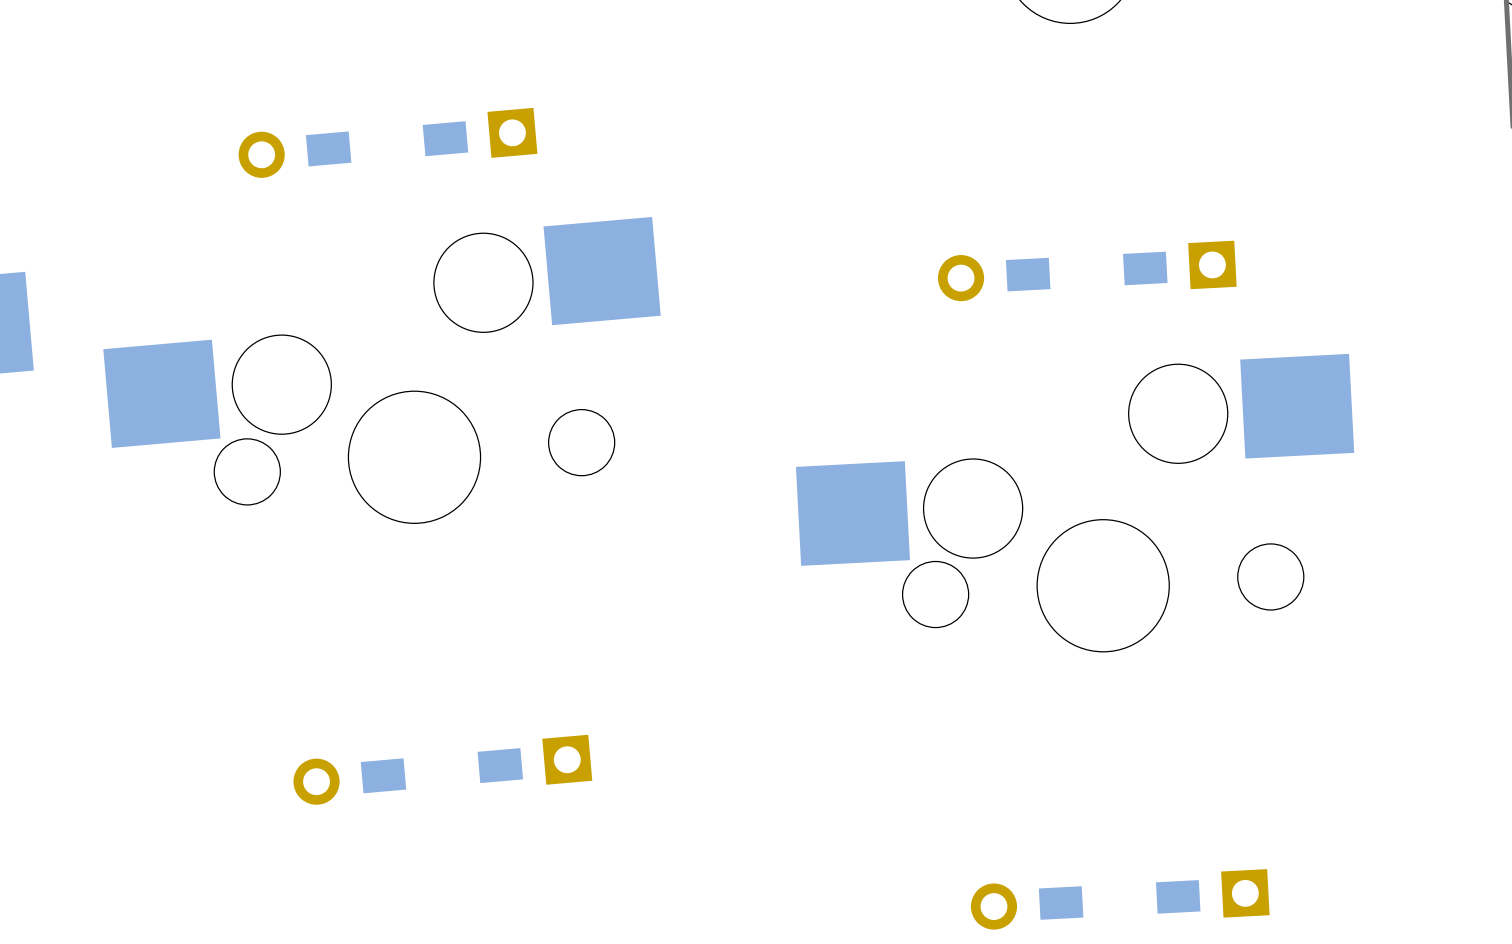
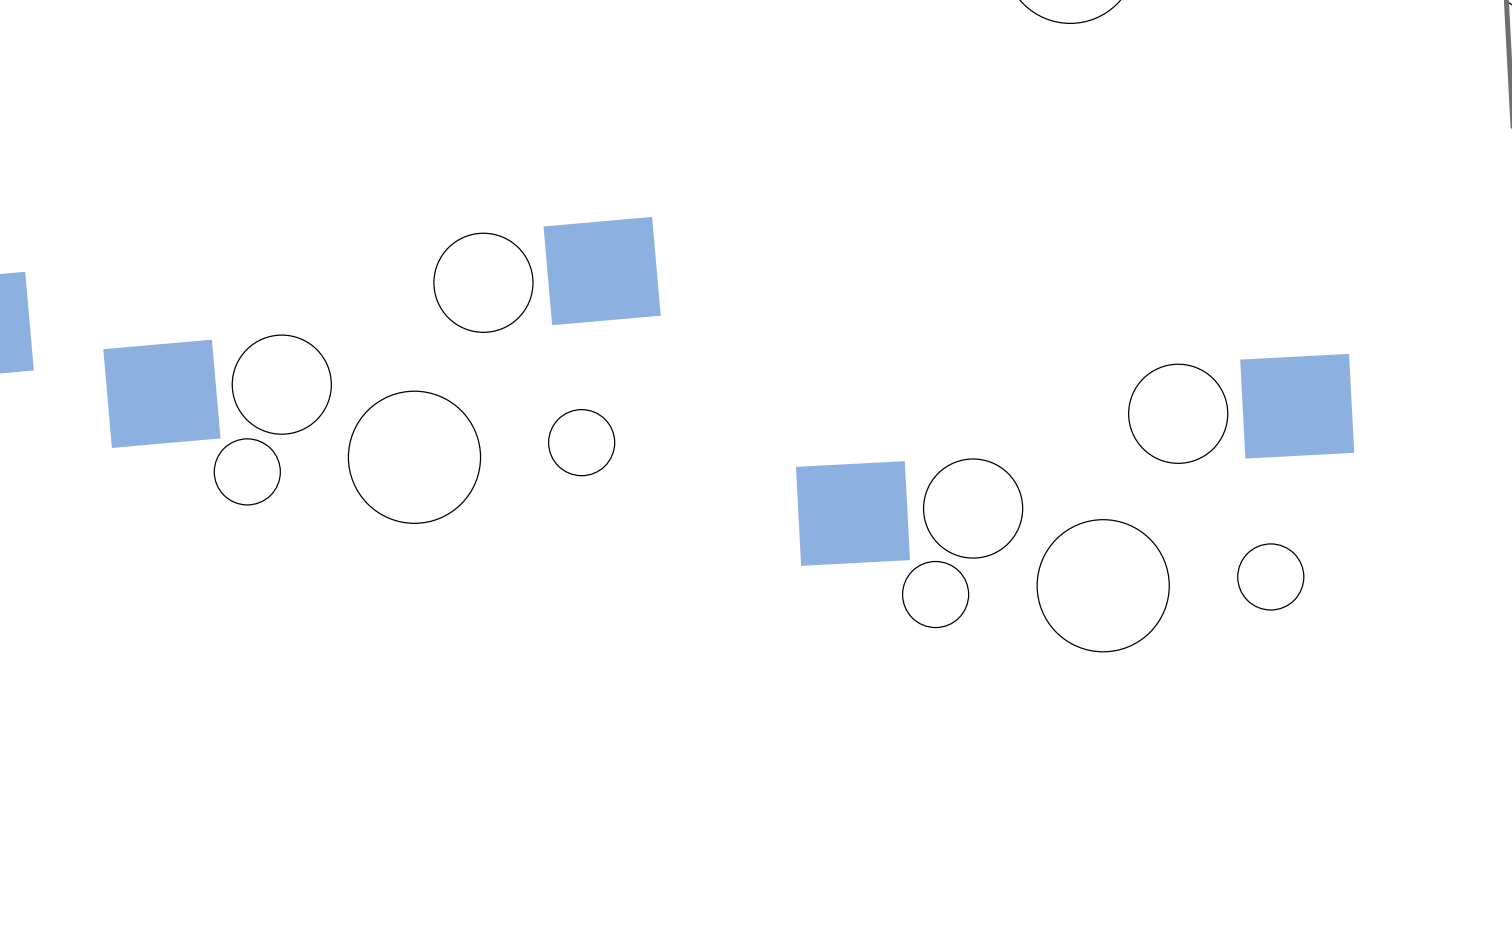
part: (388, 142) -> none
part: (1087, 270) -> none
part: (442, 769) -> none
part: (1120, 899) -> none

